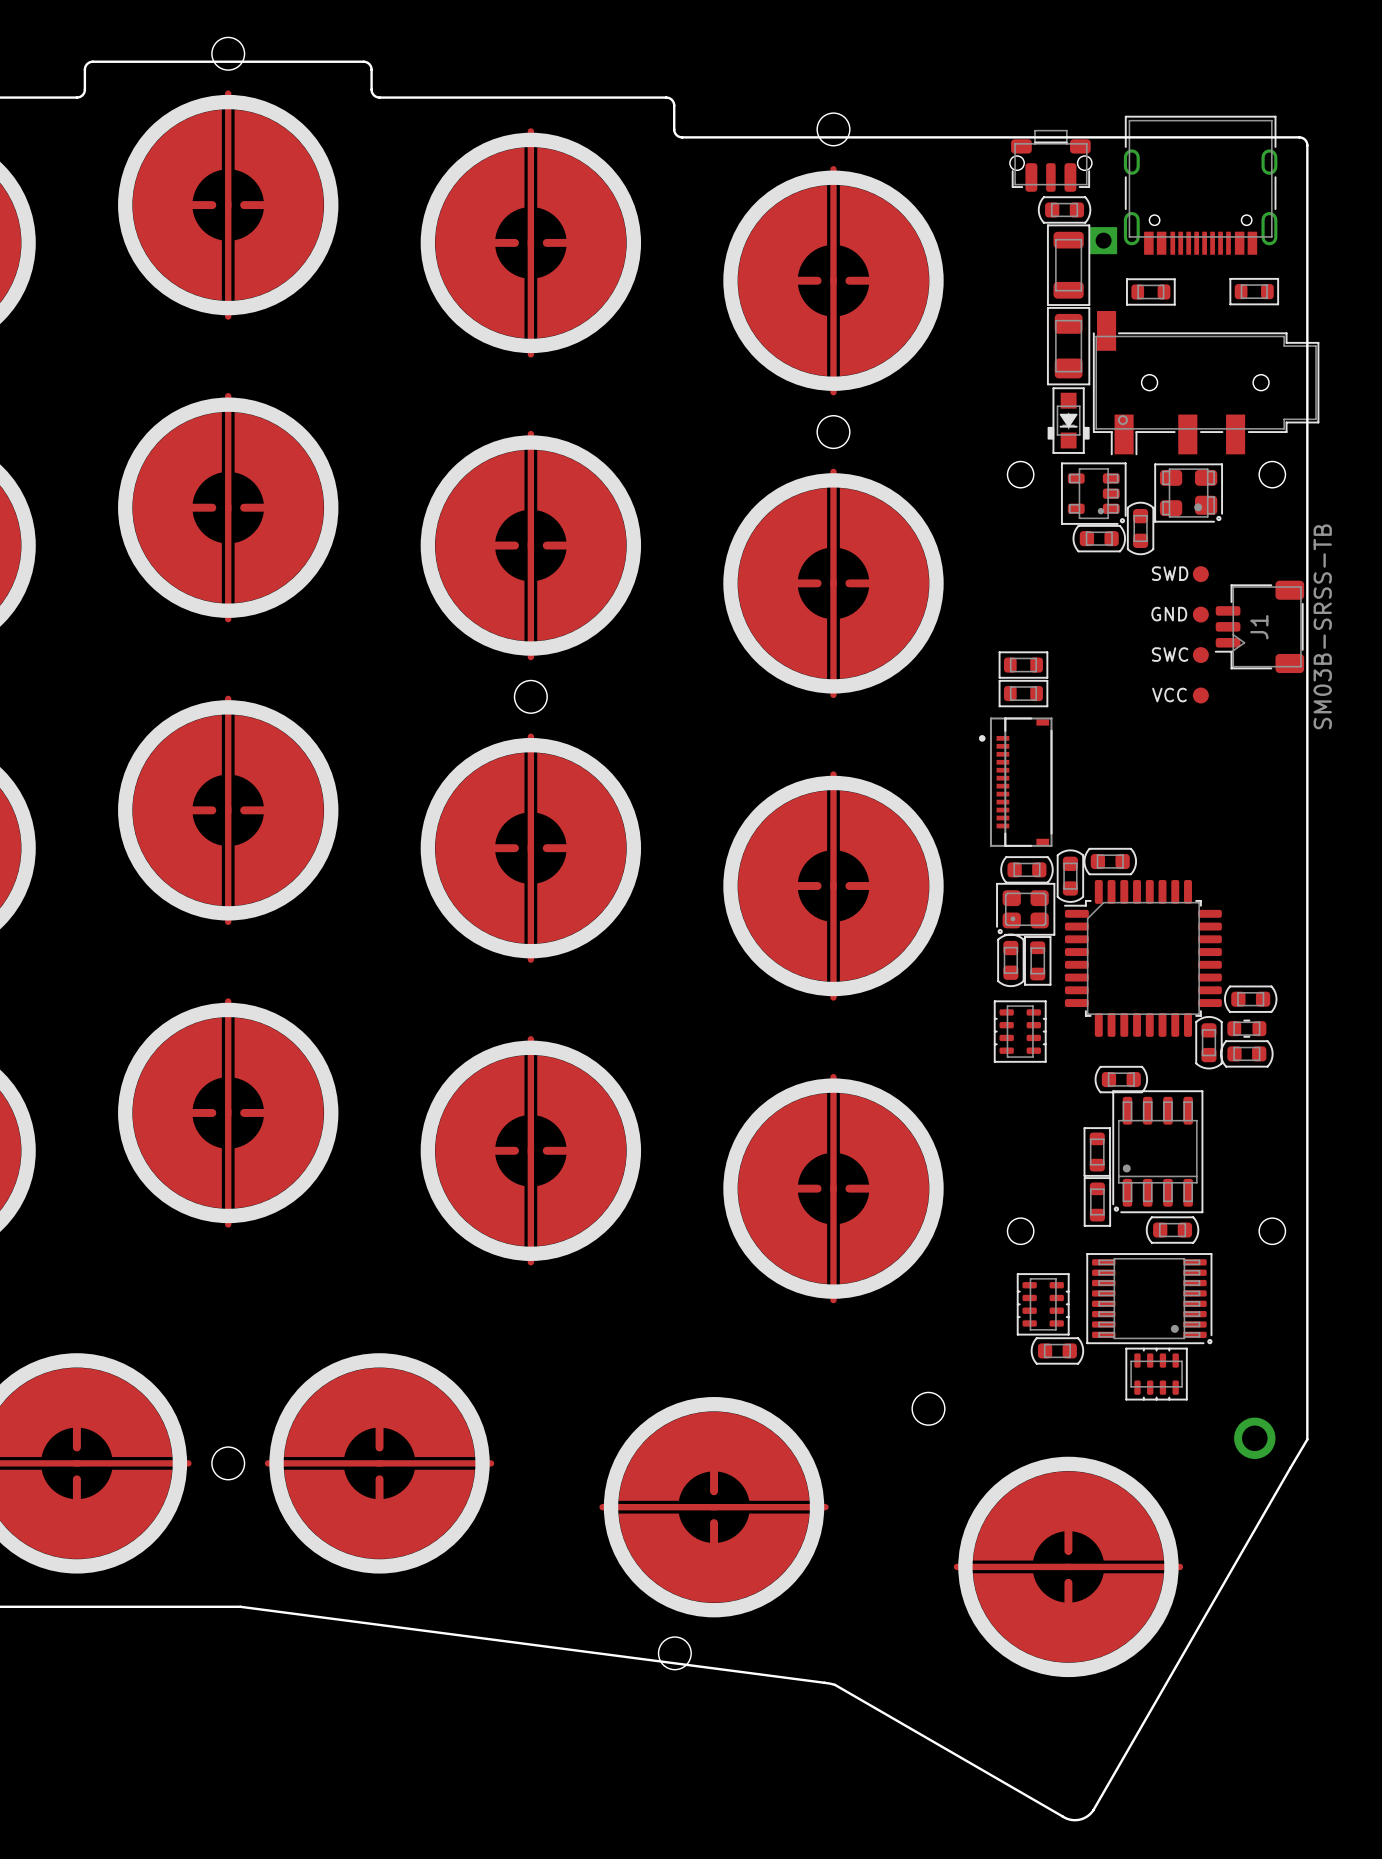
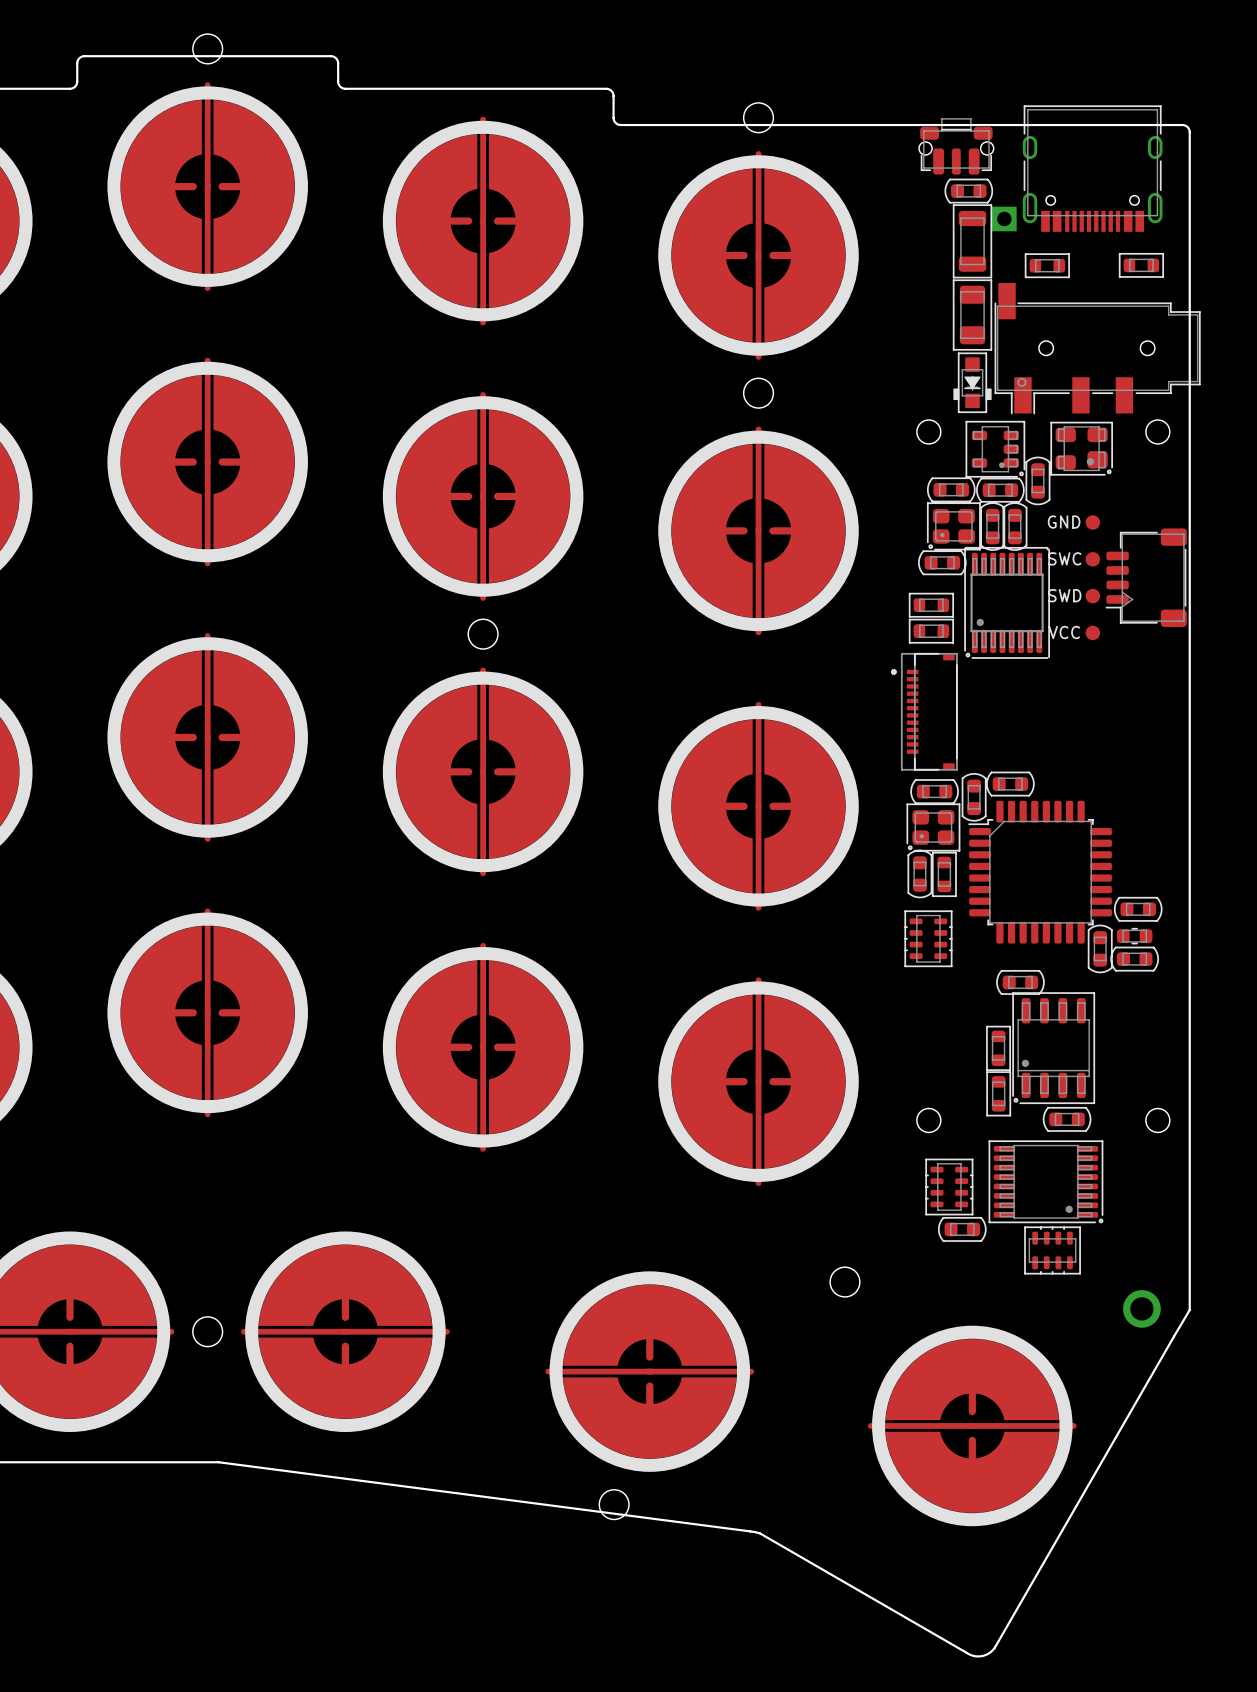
part: none -> (951, 489)
text: SWD (1170, 573) -> none
part: none -> (953, 526)
part: none -> (992, 526)
part: none -> (1014, 526)
text position: GND (1169, 614) -> GND (1064, 522)
text: none -> SWC (1064, 558)
part: none -> (942, 562)
J1: SM03B-SRSS-TB (1259, 626) -> none
part: none -> (1146, 577)
text: SWC (1170, 654) -> SWD (1064, 595)
part: none -> (1007, 602)

